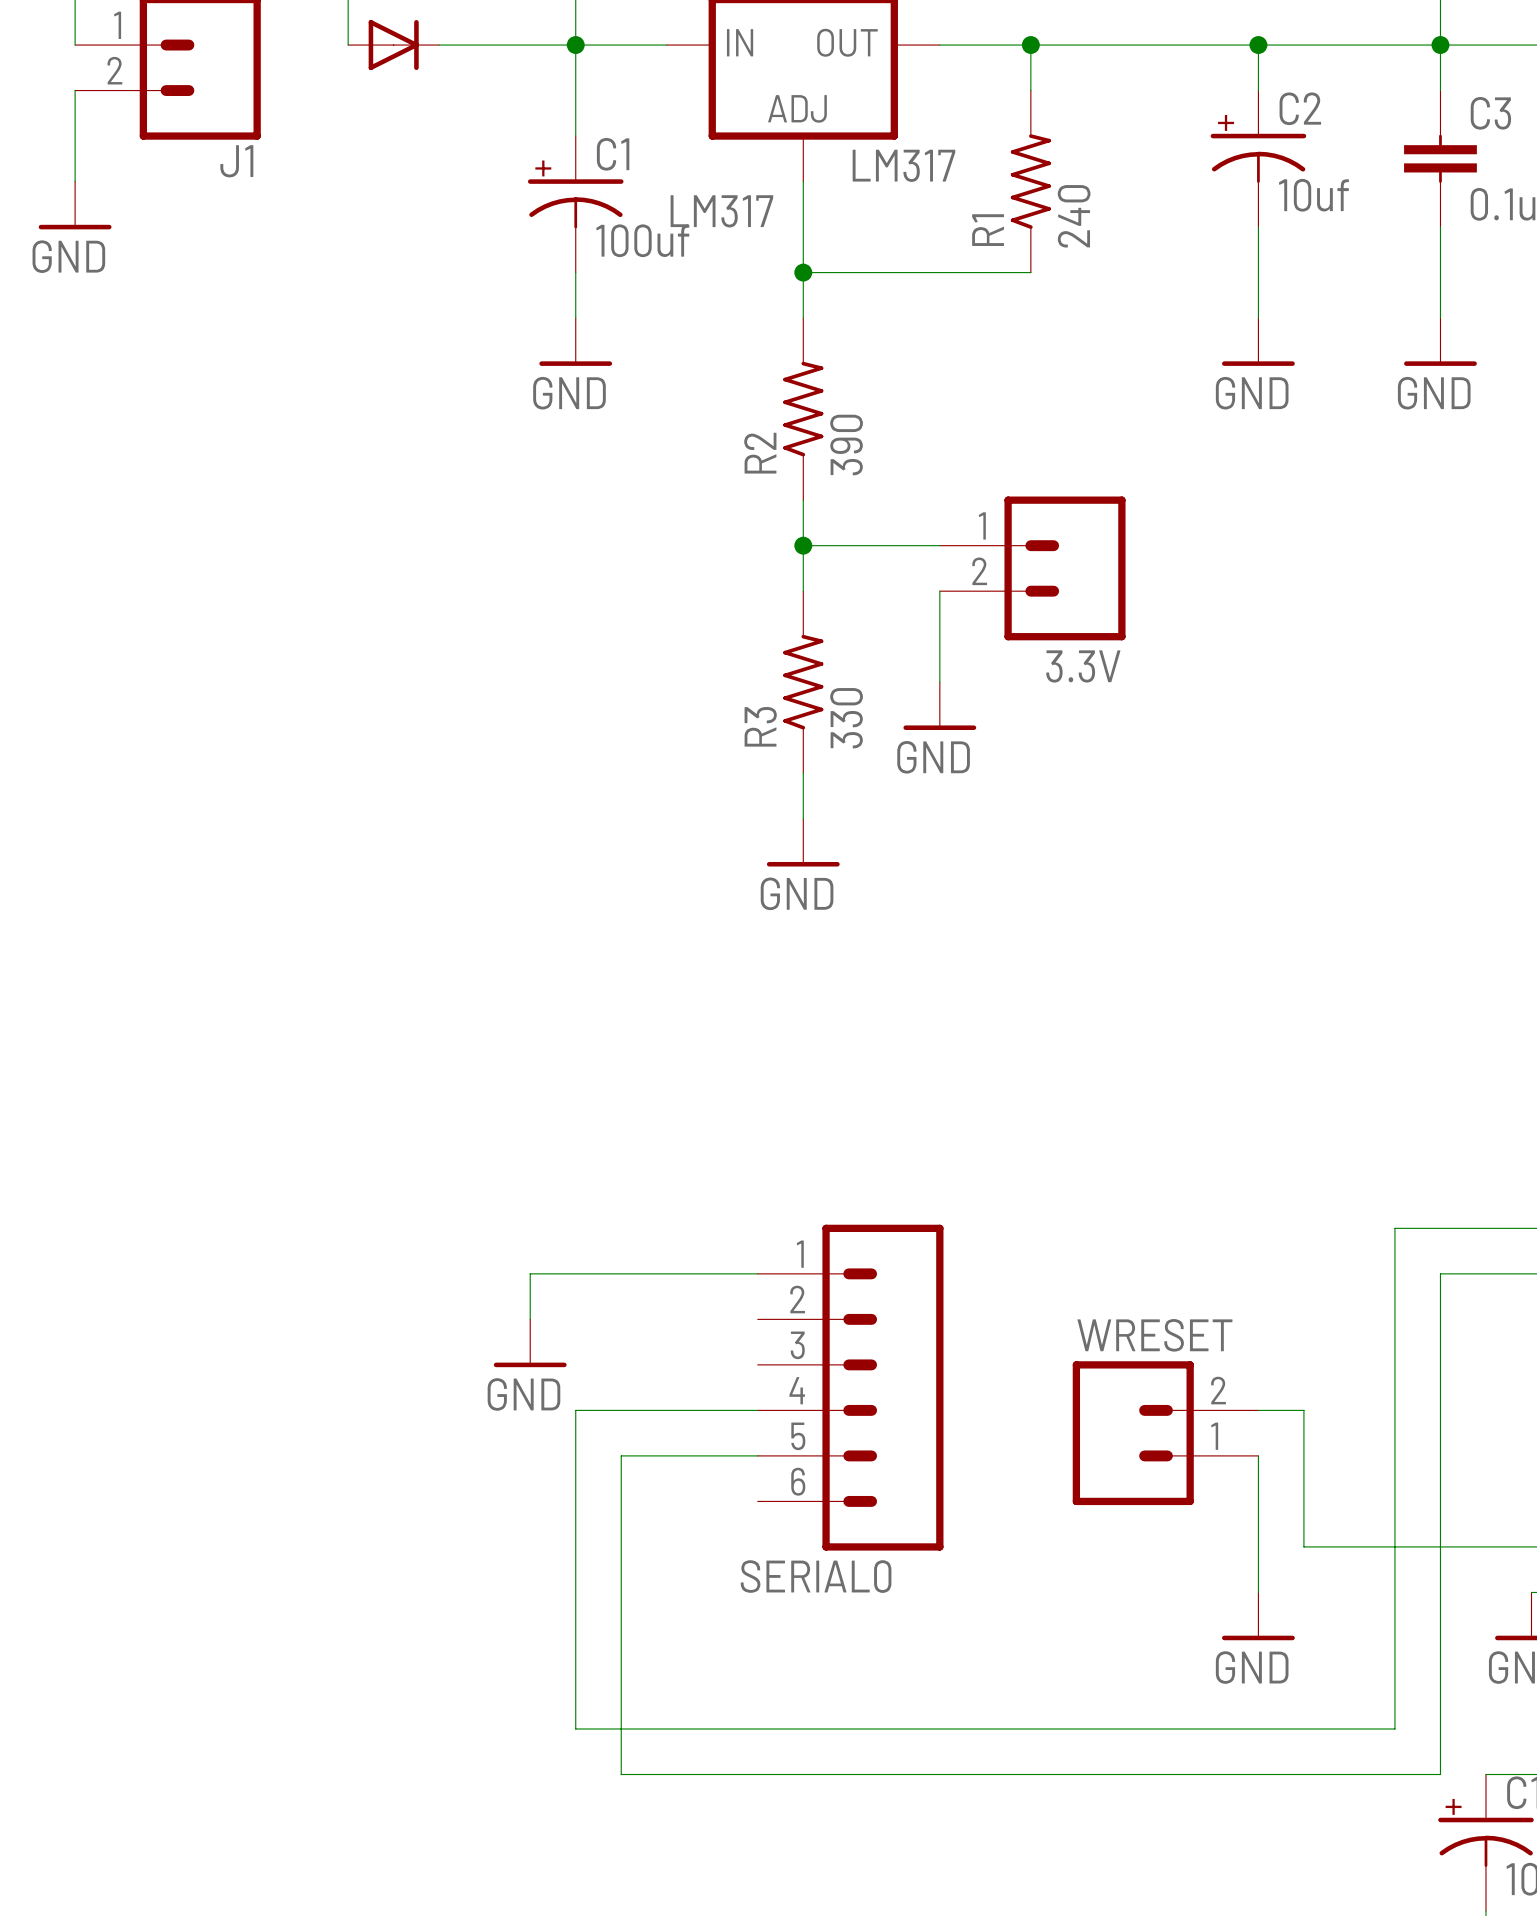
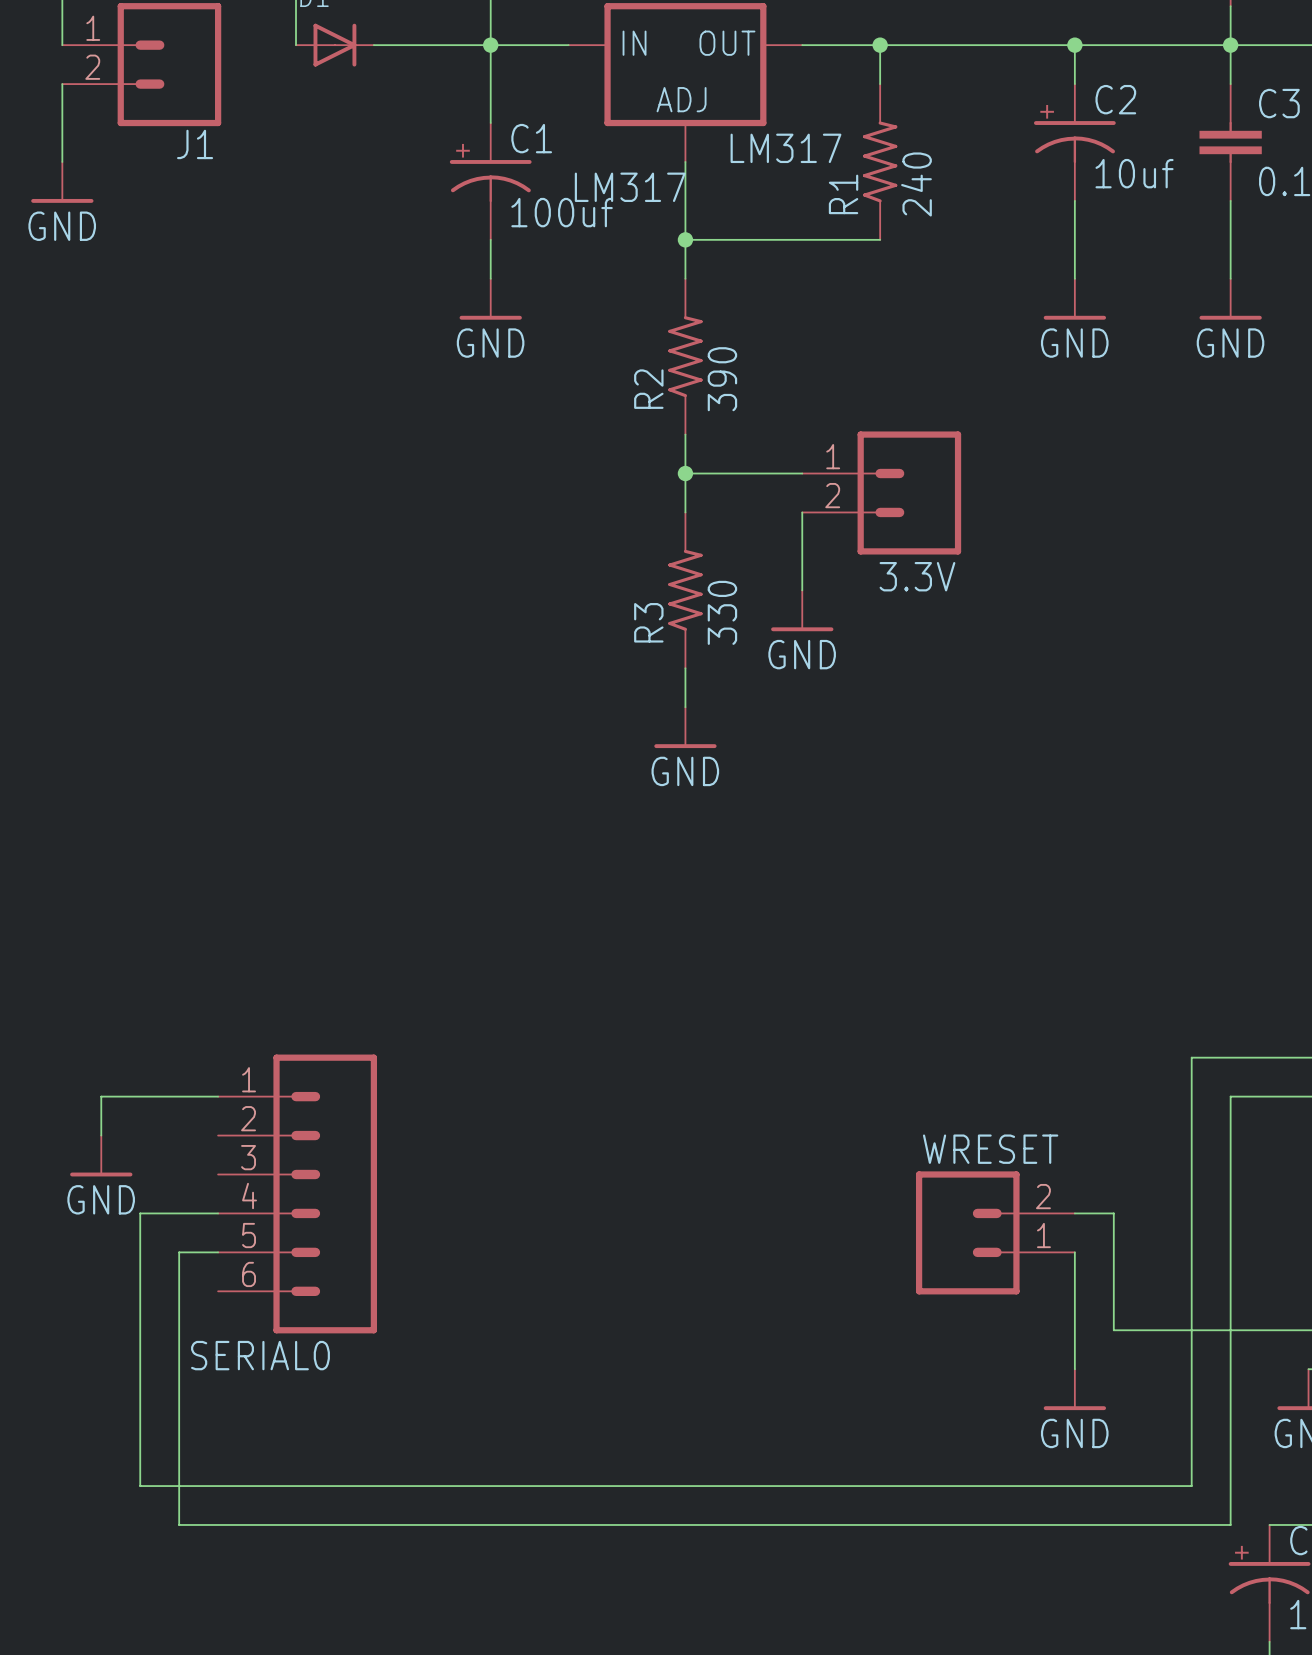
wire: none -> (218, 1096) (101, 1096) (101, 1135)
wire: (757, 1273) (530, 1273) (530, 1319) -> none
power symbol position: GND (530, 1343) -> GND (101, 1156)
SERIAL0 position: (850, 1387) -> (297, 1193)
wire: (757, 1410) (575, 1410) (575, 1728) -> (218, 1213) (140, 1213) (140, 1486) (490, 1486)
wire: (757, 1455) (621, 1455) (621, 1774) -> (218, 1252) (179, 1252) (179, 1524) (529, 1524)

